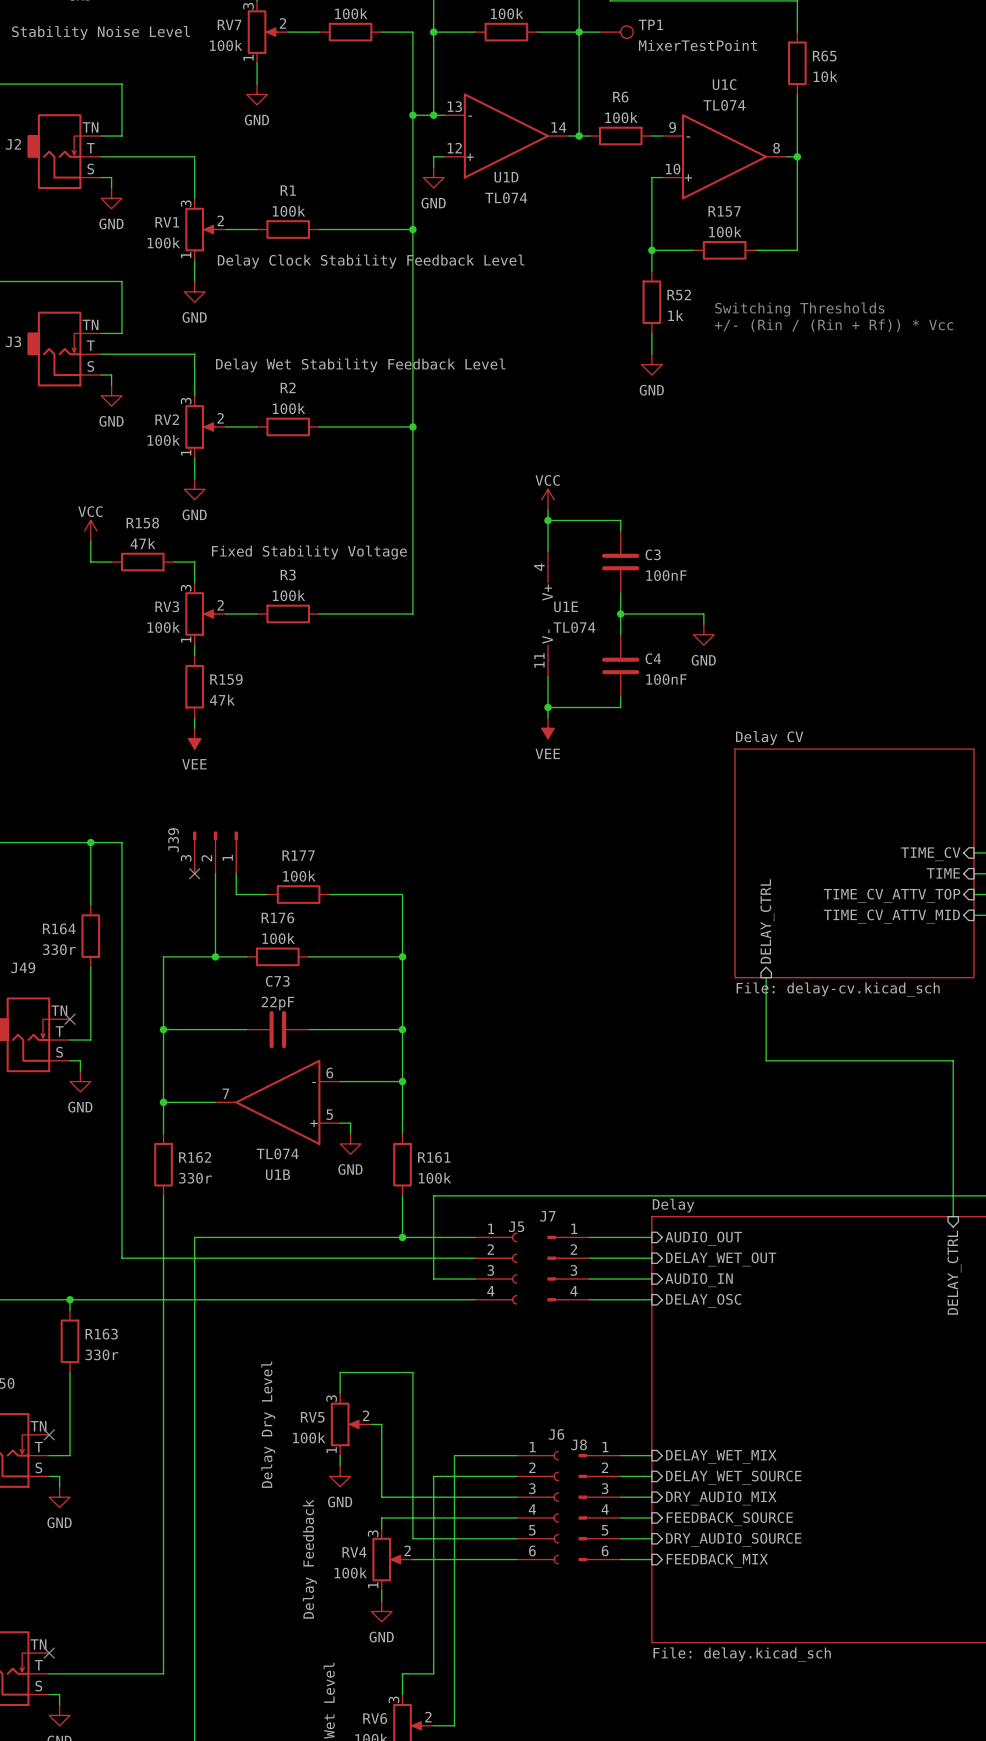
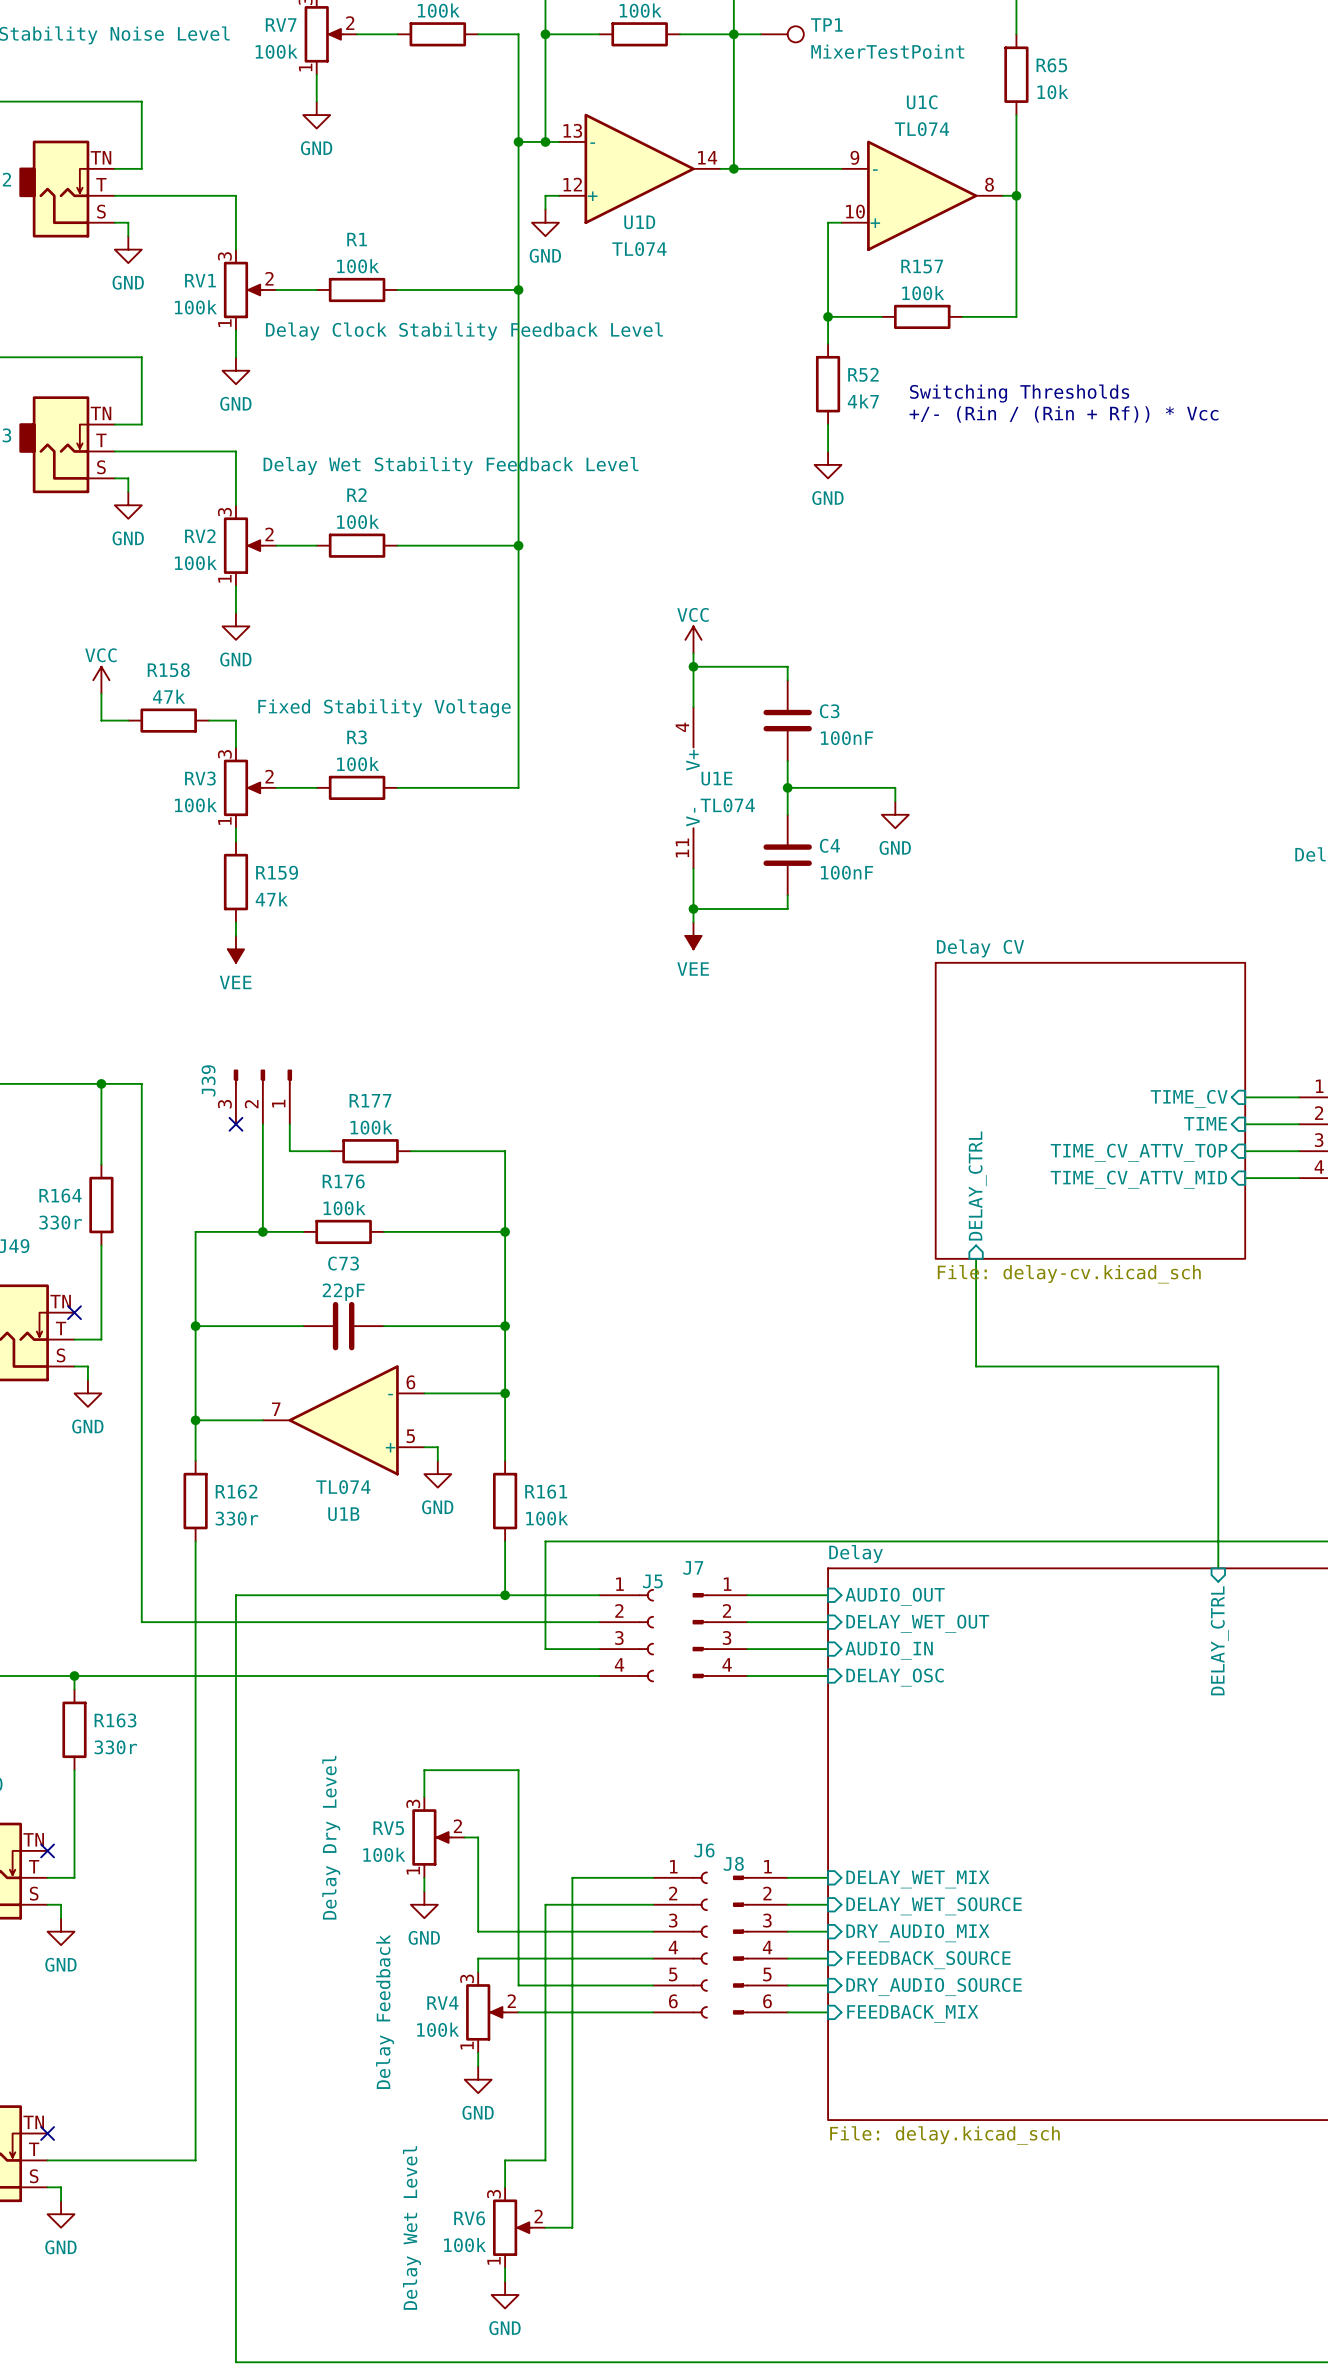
wire: none -> (747, 168) (828, 168)
R6: 100k (620, 136) -> none
R52 value: 1k (675, 315) -> 4k7 (863, 401)

